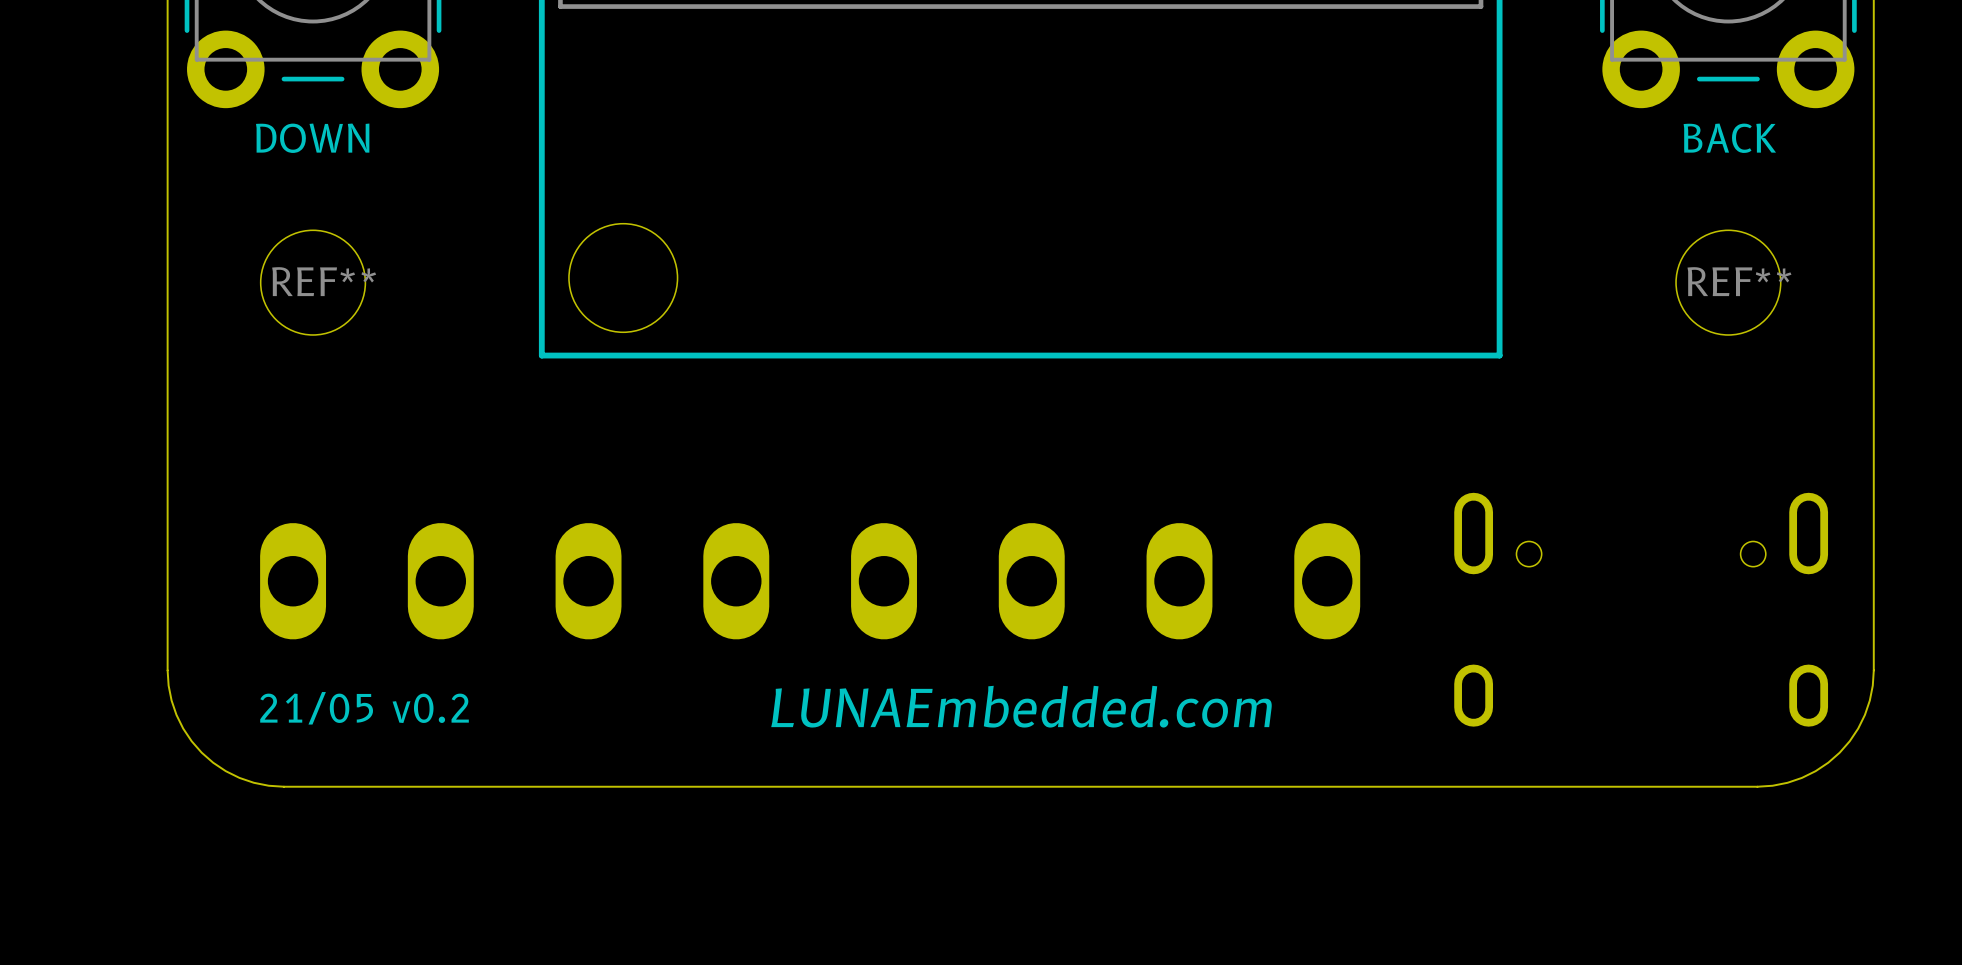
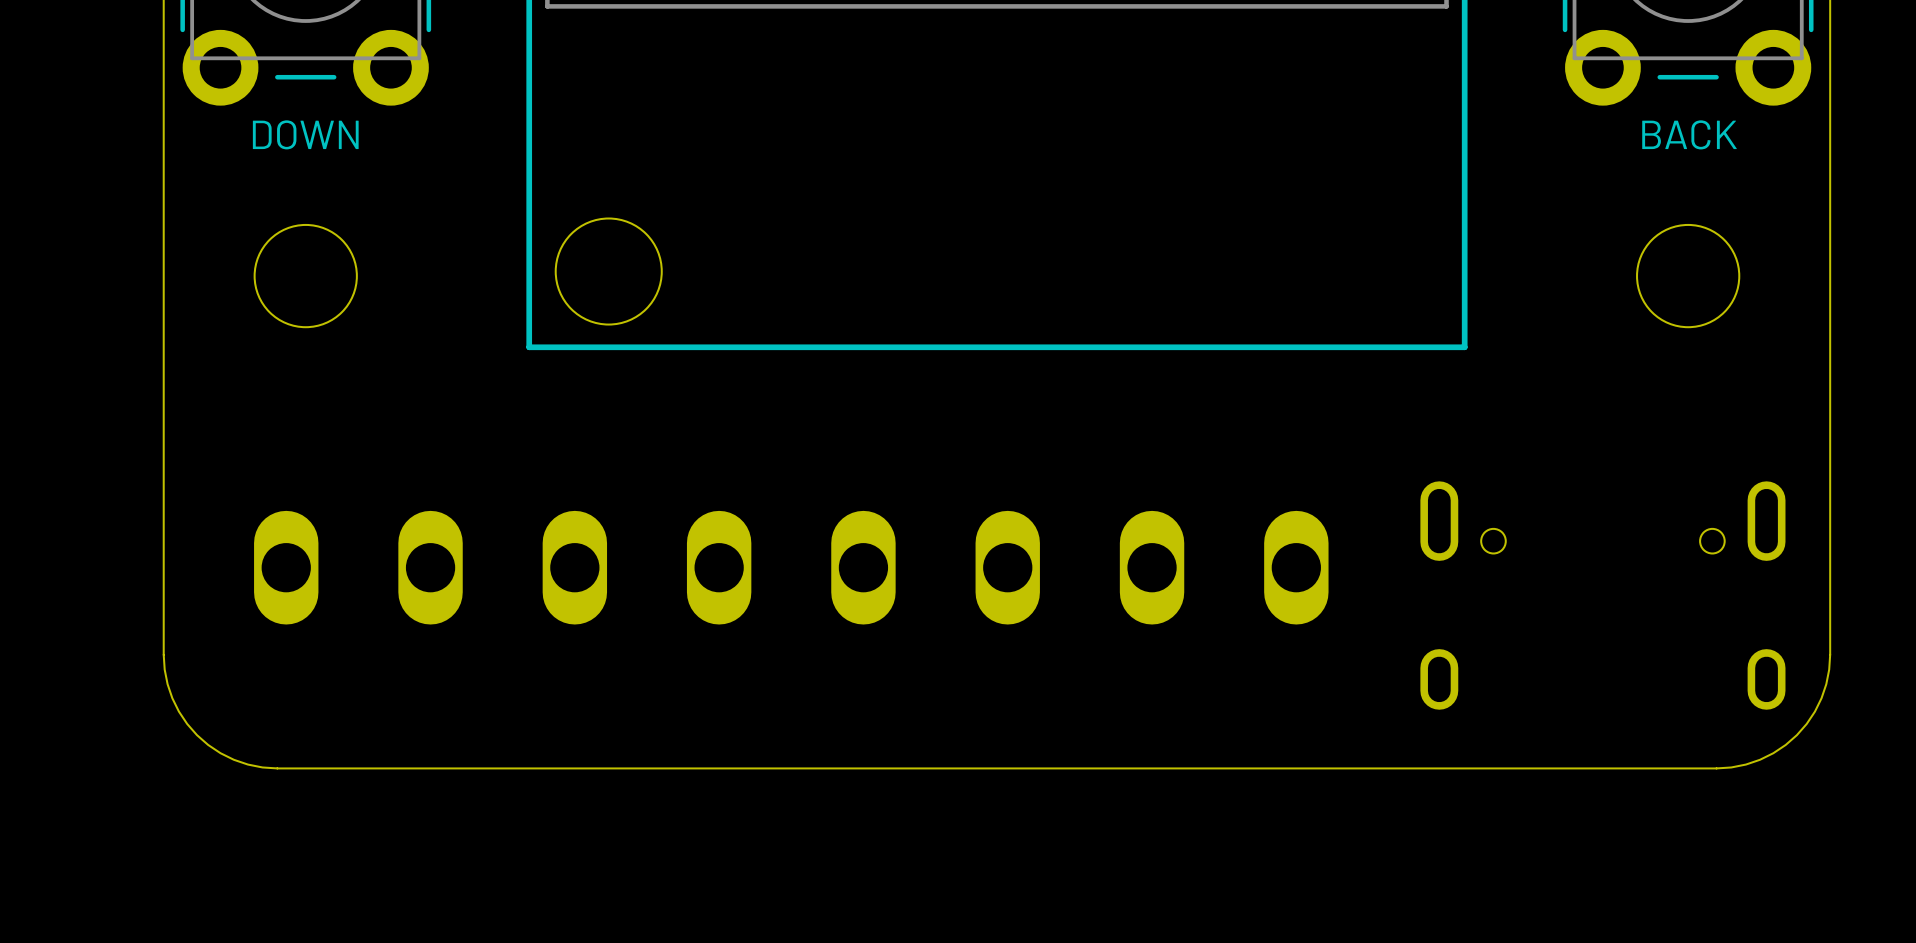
REF** name: REF** (324, 281) -> none
REF** name: REF** (1739, 281) -> none
text: LUNAEmbedded.com (1021, 706) -> none
text: 21/05 v0.2 (364, 708) -> none

